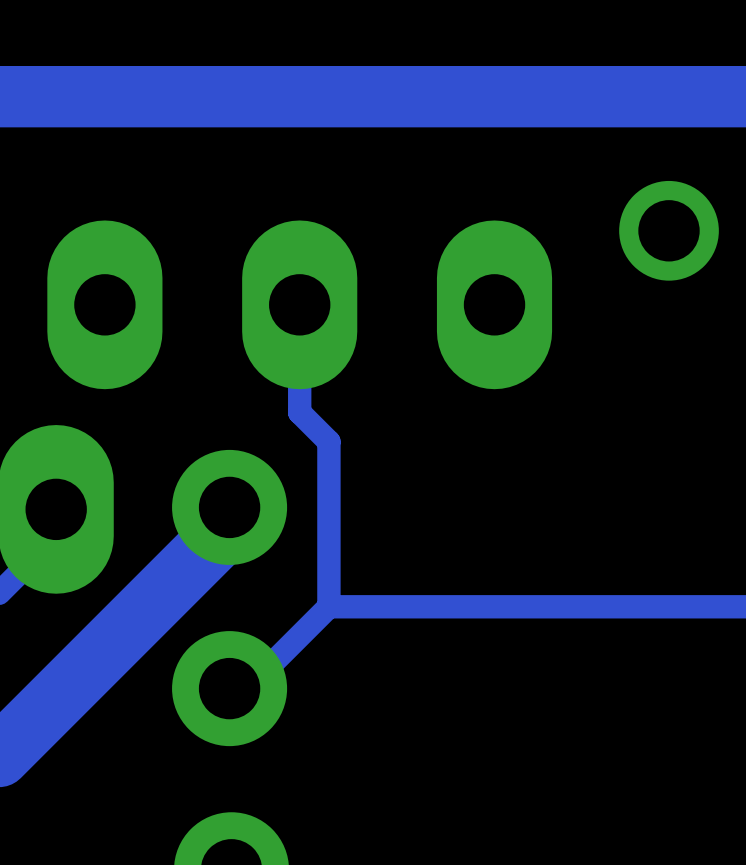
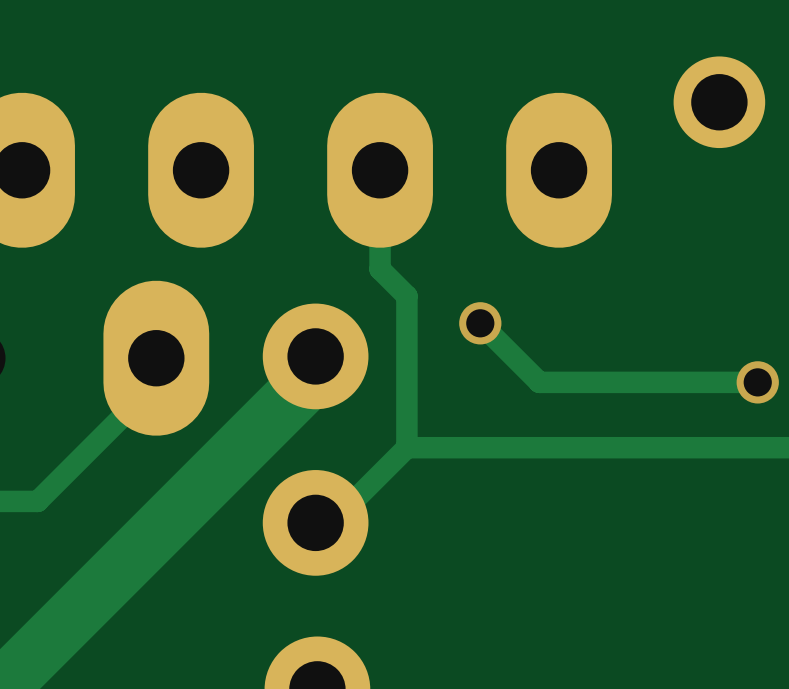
track: none -> (480, 323) (539, 382) (757, 382)
via: none -> (480, 323)
via: none -> (757, 382)

